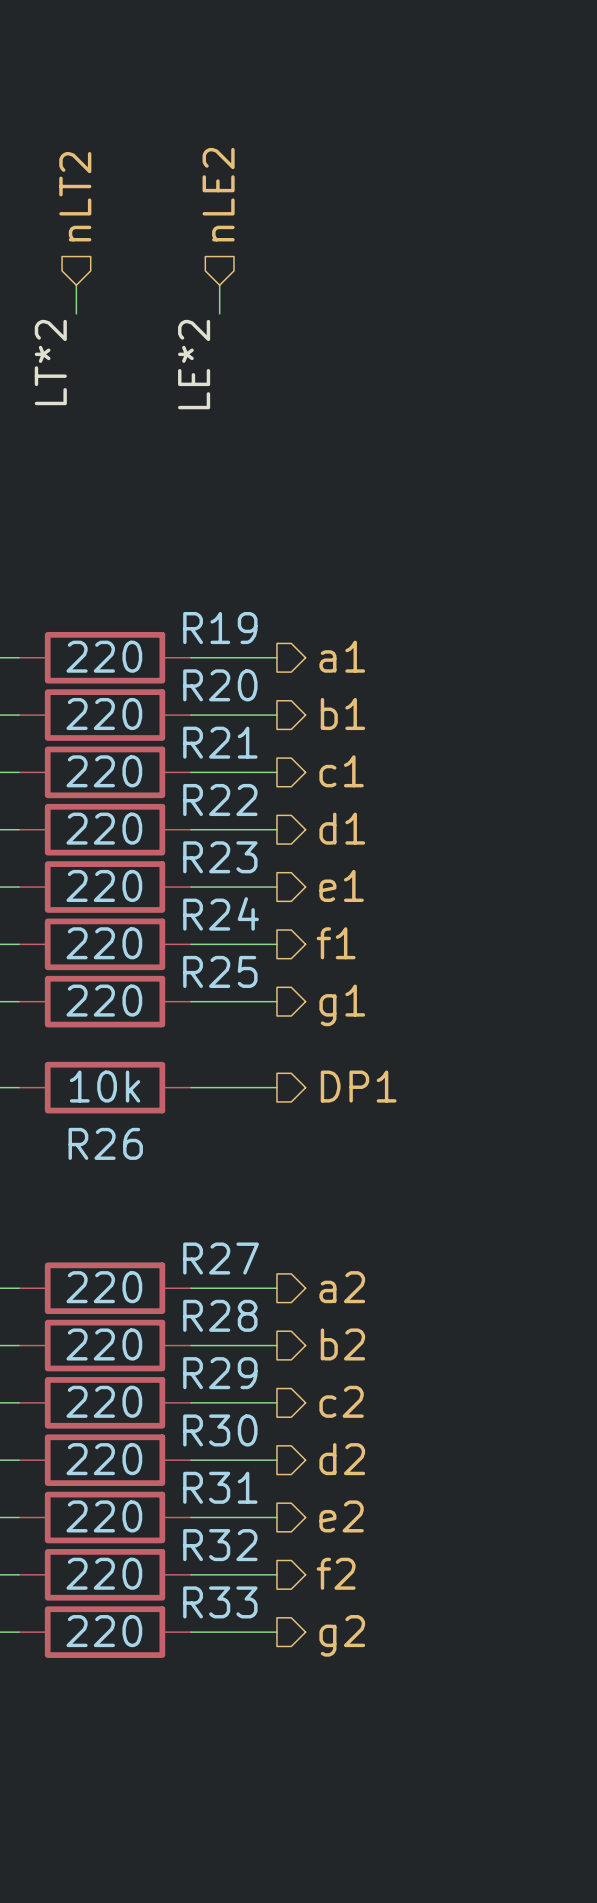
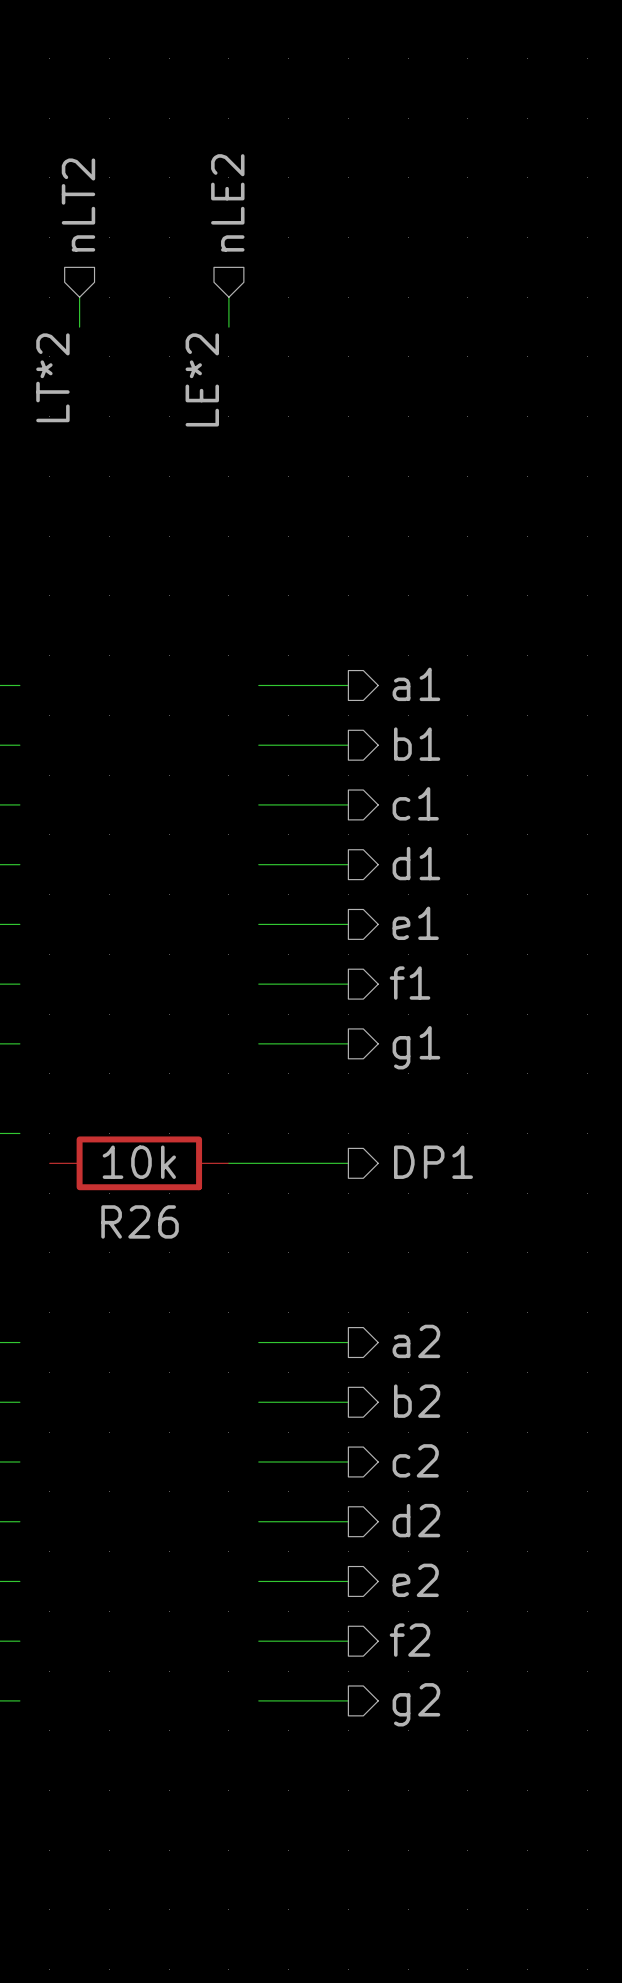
hierarchical label position: a1 (342, 656) -> a1 (416, 684)
R19: 220 (105, 657) -> none
wire: (191, 657) (248, 657) -> (288, 685) (348, 685)
hierarchical label position: b1 (342, 714) -> b1 (417, 744)
R20: 220 (105, 715) -> none
wire: (191, 715) (248, 715) -> (288, 745) (348, 745)
hierarchical label position: c1 (341, 771) -> c1 (415, 803)
R21: 220 (105, 772) -> none
wire: (191, 772) (248, 772) -> (288, 804) (348, 804)
hierarchical label position: d1 (342, 828) -> d1 (416, 863)
R22: 220 (105, 829) -> none
wire: (191, 829) (248, 829) -> (288, 864) (348, 864)
hierarchical label position: e1 (341, 885) -> e1 (415, 923)
R23: 220 (105, 887) -> none
wire: (191, 887) (248, 887) -> (288, 924) (348, 924)
hierarchical label position: f1 (336, 943) -> f1 (410, 983)
R24: 220 (105, 944) -> none
wire: (191, 944) (248, 944) -> (288, 984) (348, 984)
R25: 220 (105, 1001) -> none
wire: (191, 1001) (248, 1001) -> (288, 1043) (348, 1043)
hierarchical label position: g1 (342, 1005) -> g1 (416, 1047)
hierarchical label position: DP1 (358, 1086) -> DP1 (433, 1162)
R26 position: (105, 1087) -> (139, 1163)
wire: (191, 1087) (276, 1087) -> none
wire: none -> (228, 1163) (348, 1163)
hierarchical label position: a2 (342, 1287) -> a2 (416, 1341)
R27: 220 (105, 1288) -> none
wire: (191, 1288) (248, 1288) -> (288, 1342) (348, 1342)
hierarchical label position: b2 (342, 1344) -> b2 (417, 1401)
R28: 220 (105, 1345) -> none
wire: (191, 1345) (248, 1345) -> (288, 1402) (348, 1402)
hierarchical label position: c2 (341, 1401) -> c2 (415, 1460)
R29: 220 (105, 1402) -> none
wire: (191, 1402) (248, 1402) -> (288, 1461) (348, 1461)
hierarchical label position: d2 (342, 1459) -> d2 (416, 1520)
R30: 220 (105, 1460) -> none
wire: (191, 1460) (248, 1460) -> (288, 1521) (348, 1521)
hierarchical label position: e2 (341, 1516) -> e2 (415, 1580)
R31: 220 (105, 1517) -> none
wire: (191, 1517) (248, 1517) -> (288, 1581) (348, 1581)
hierarchical label position: f2 (336, 1573) -> f2 (410, 1640)
R32: 220 (105, 1574) -> none
wire: (191, 1574) (248, 1574) -> (288, 1641) (348, 1641)
R33: 220 (105, 1632) -> none
wire: (191, 1632) (248, 1632) -> (288, 1700) (348, 1700)
hierarchical label position: g2 (342, 1635) -> g2 (416, 1704)

